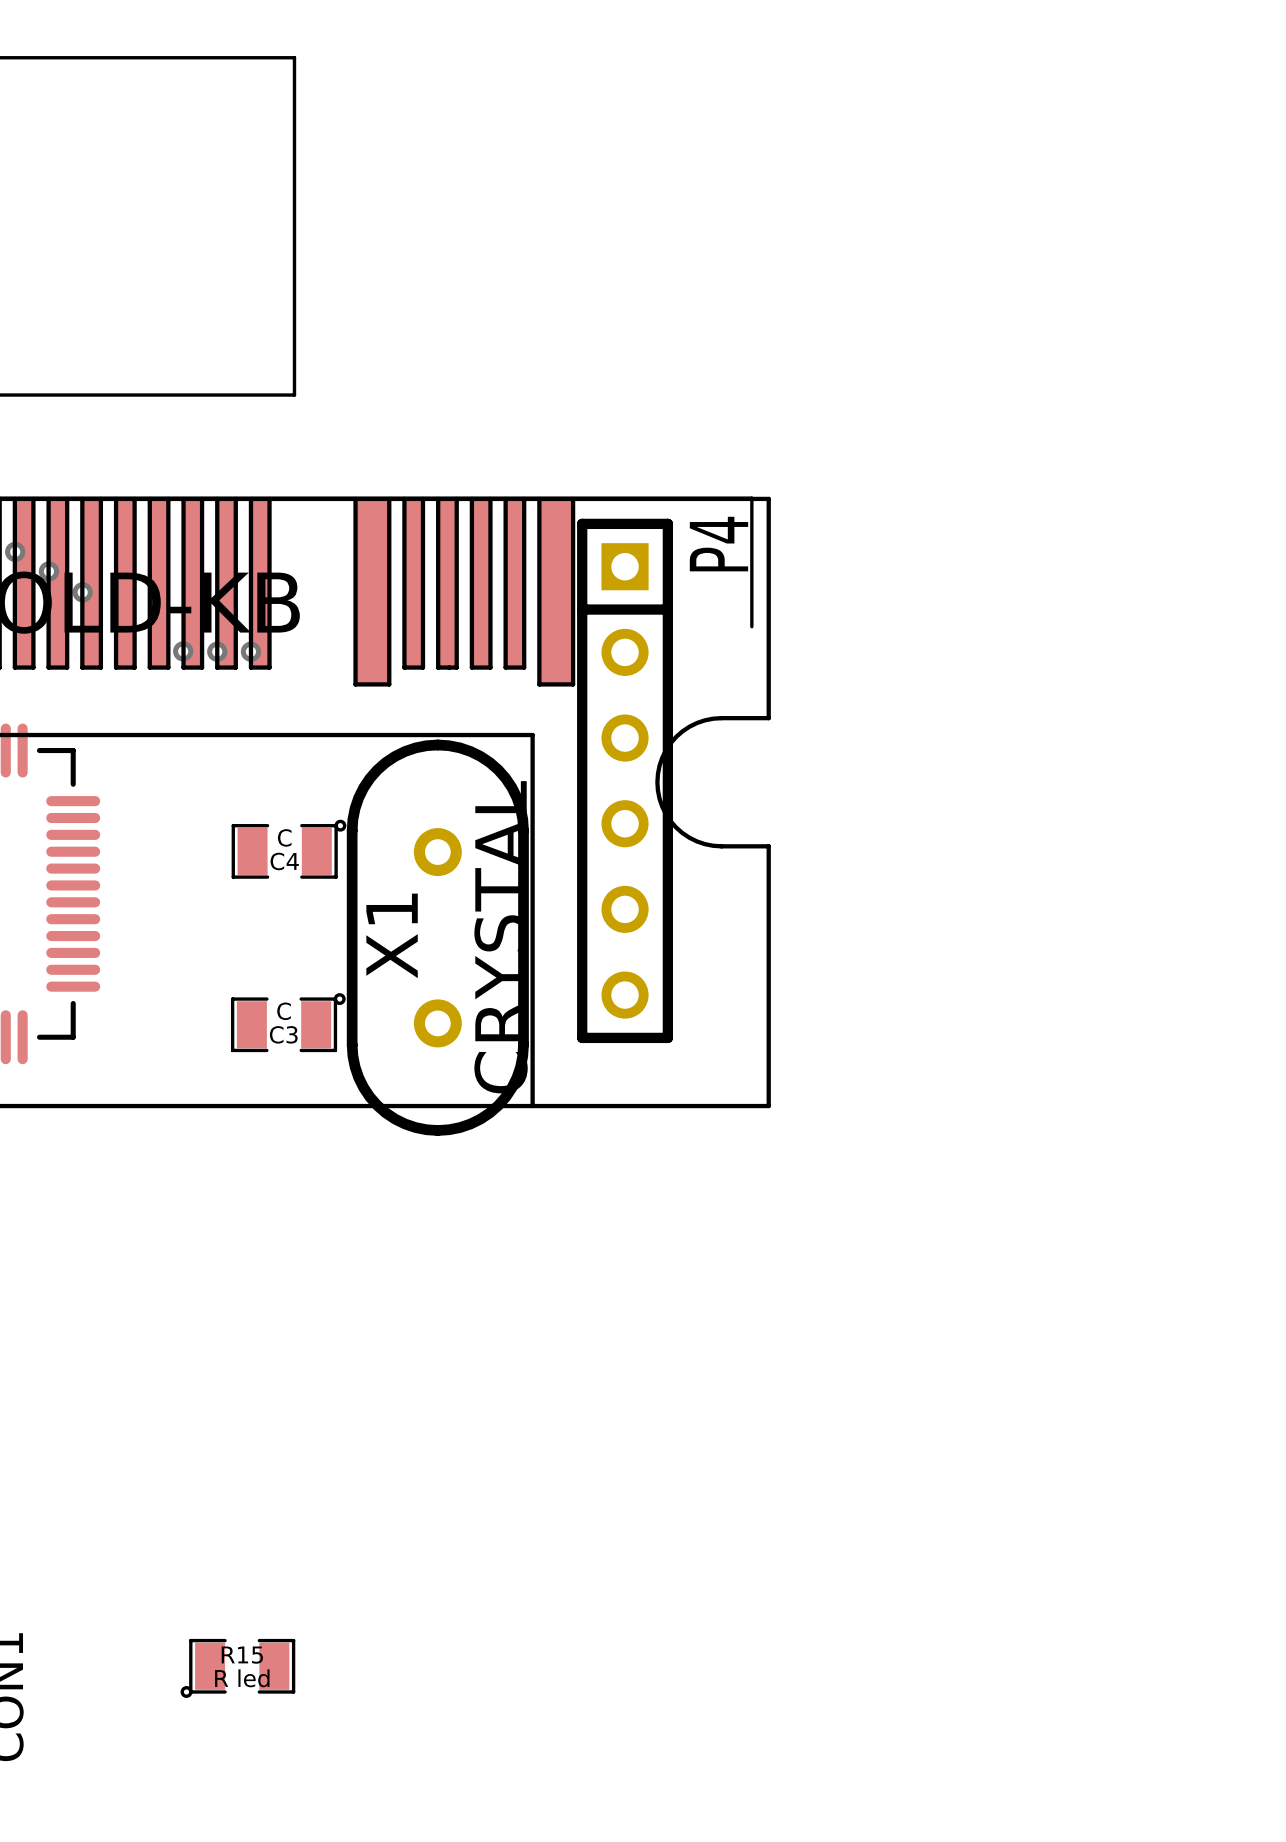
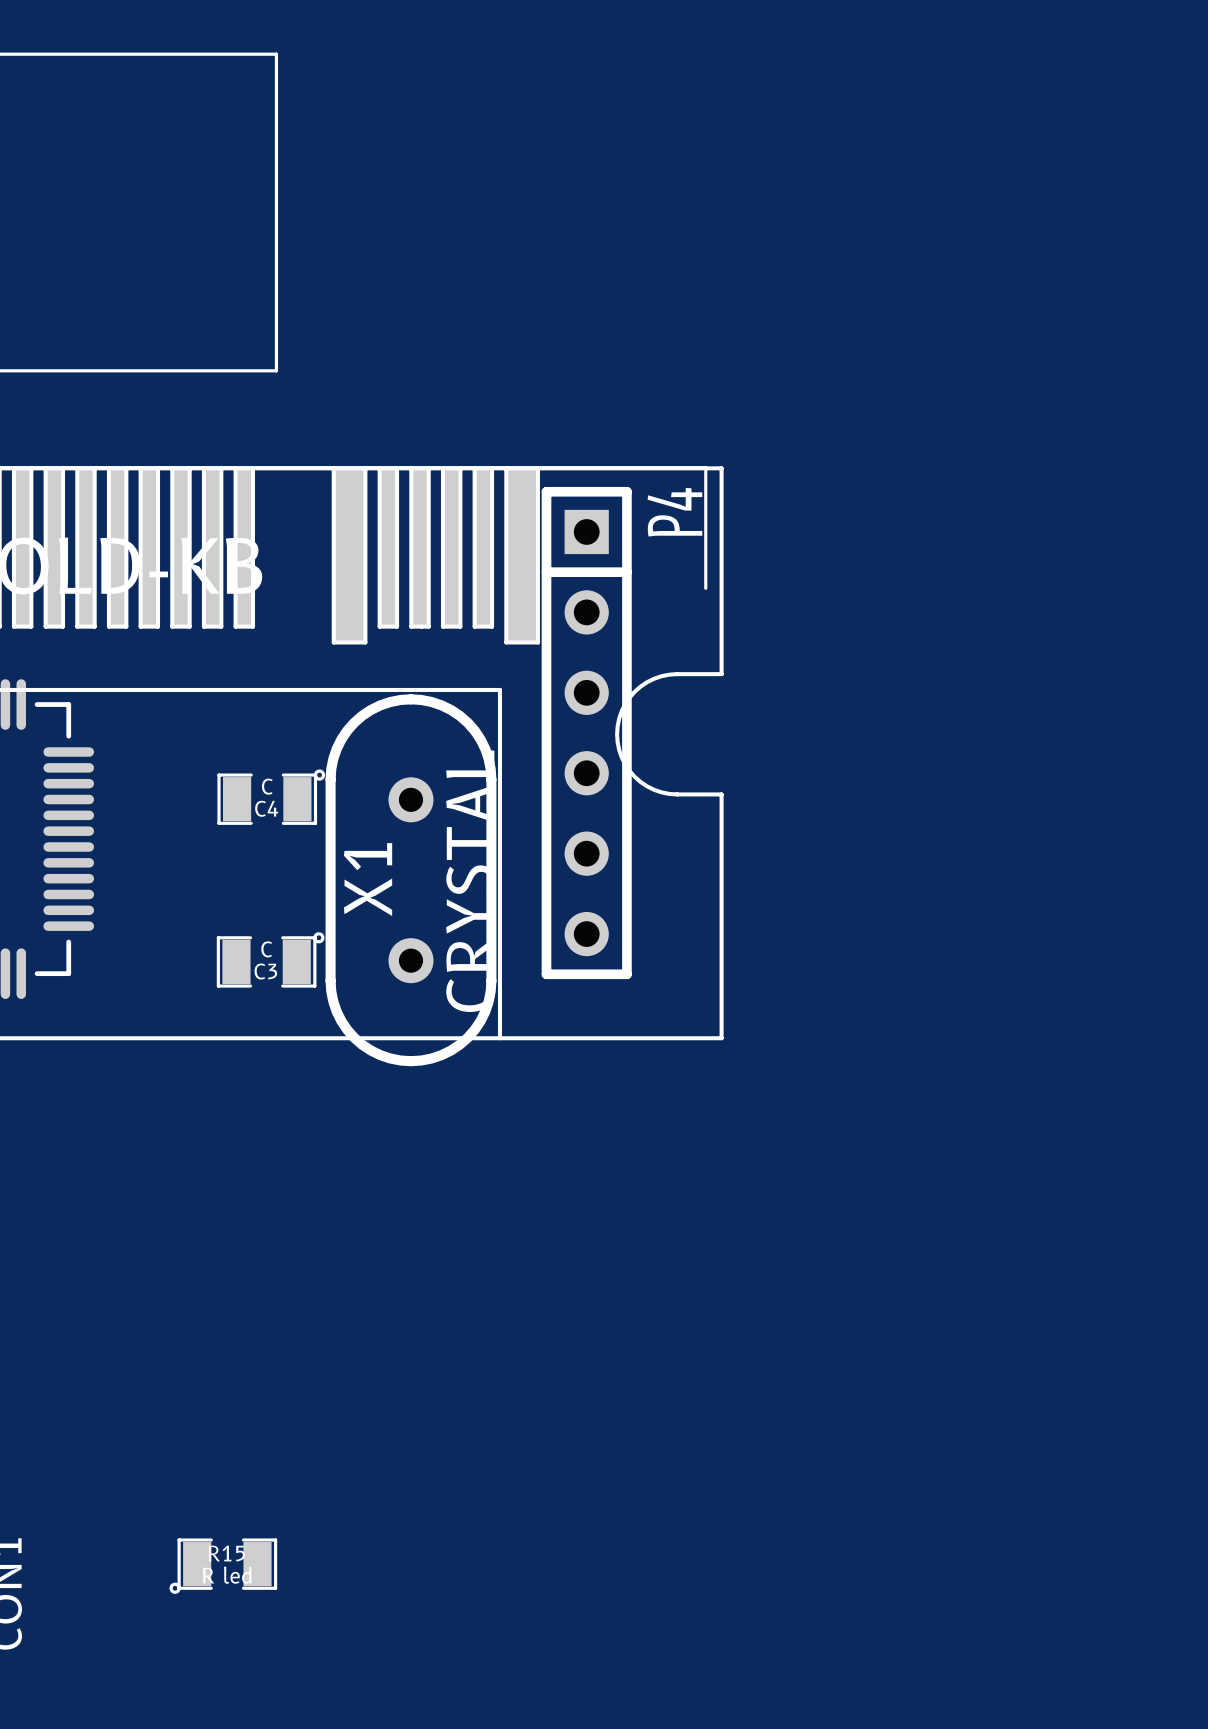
via: (15, 551) -> none
via: (48, 571) -> none
via: (82, 592) -> none
via: (183, 651) -> none
via: (217, 651) -> none
via: (250, 651) -> none

